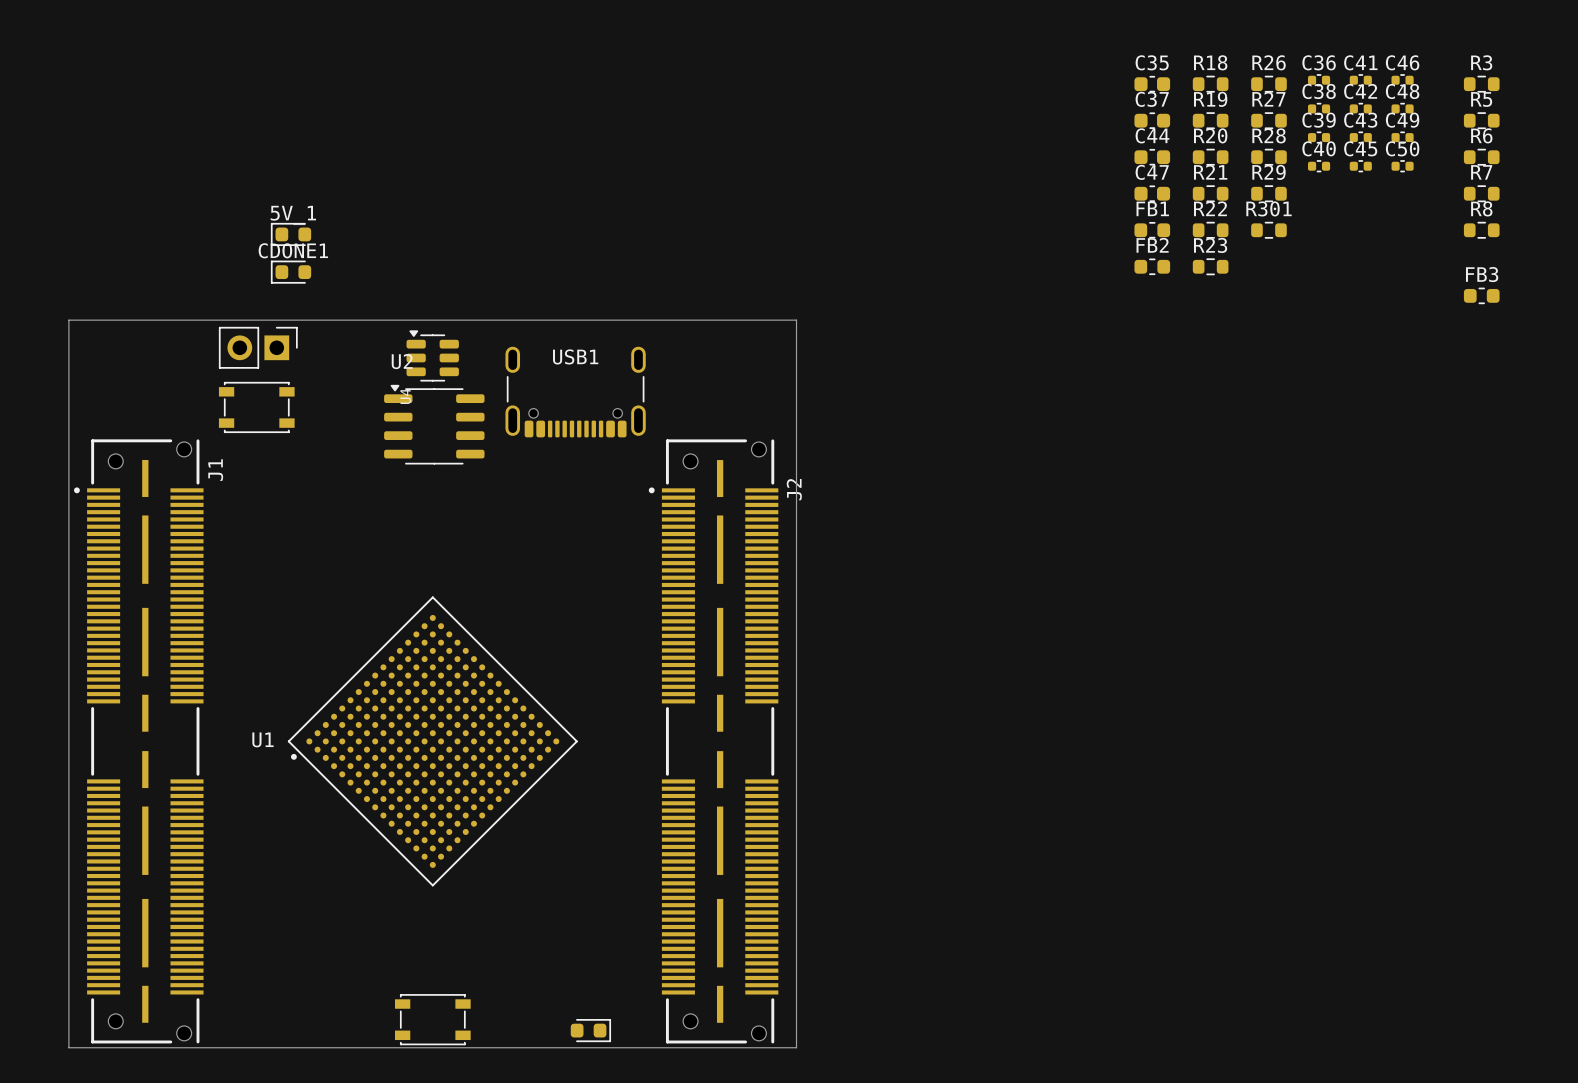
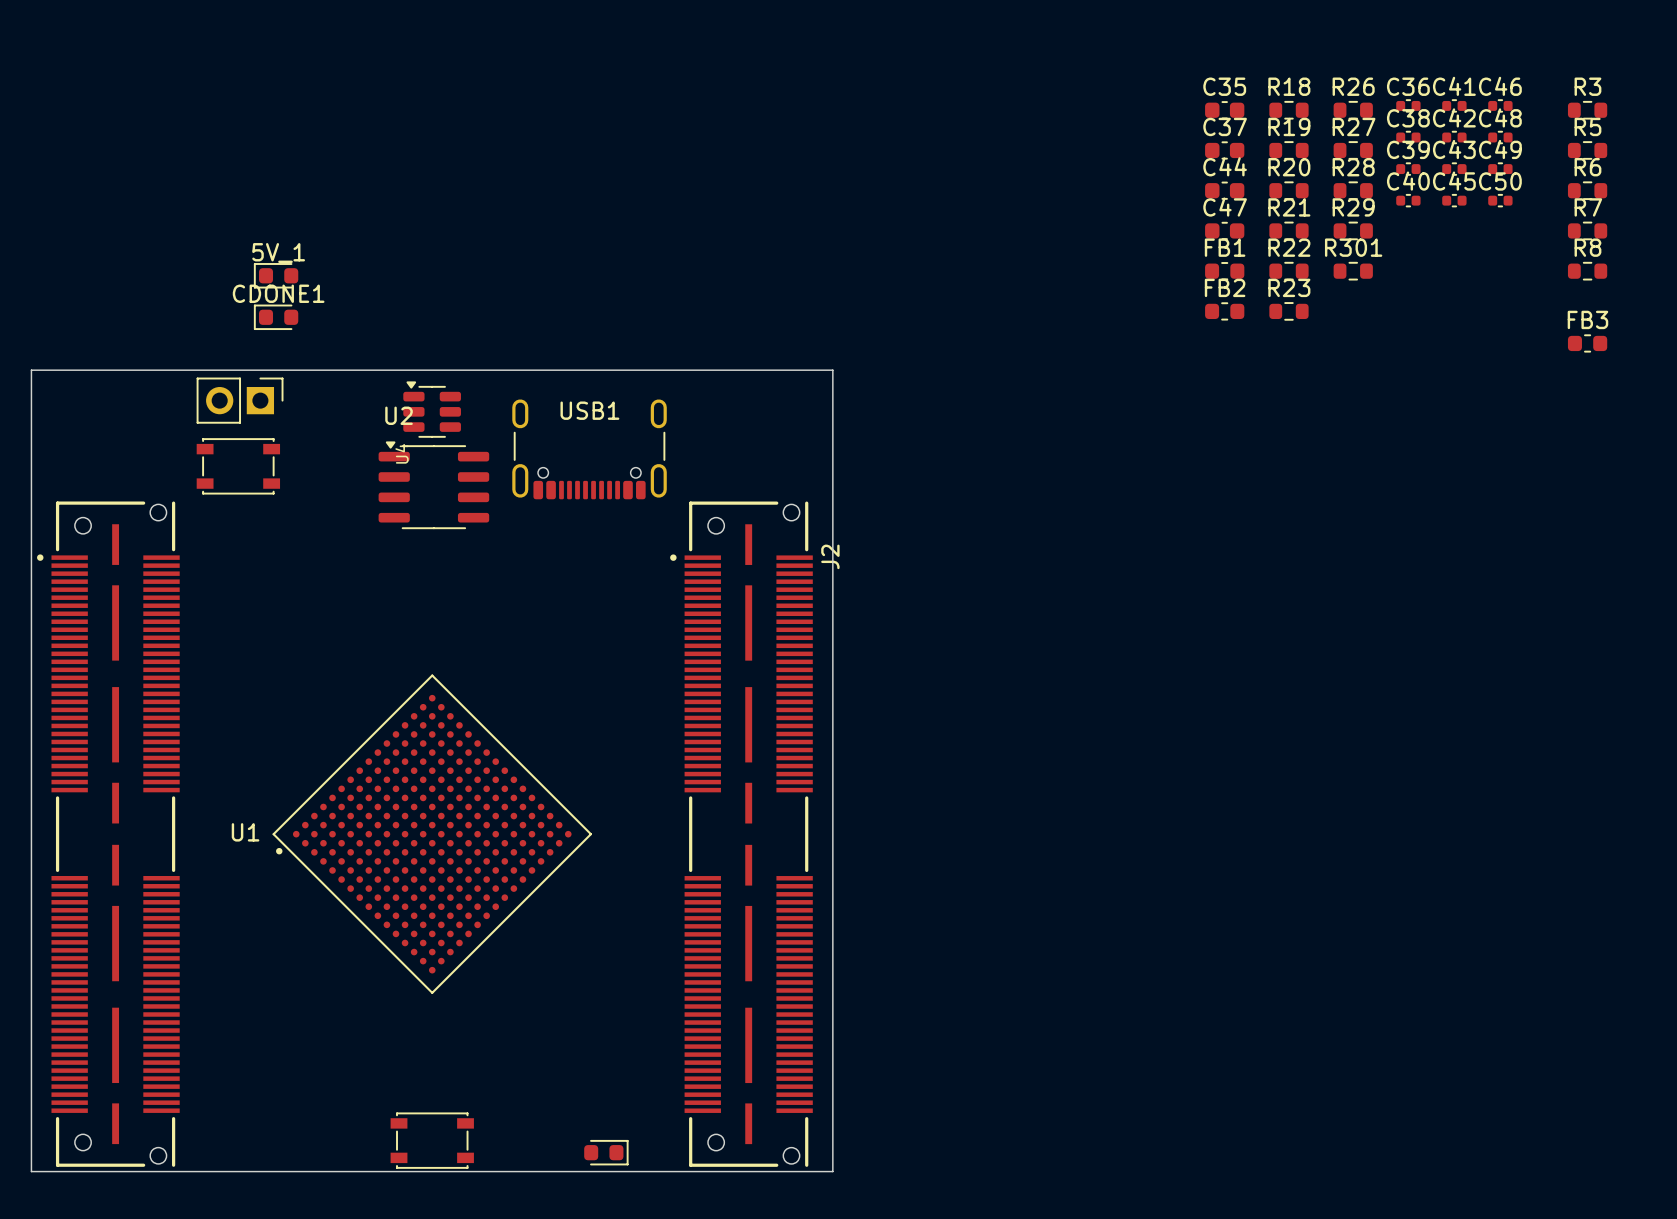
J1 name: J1 (215, 470) -> none

